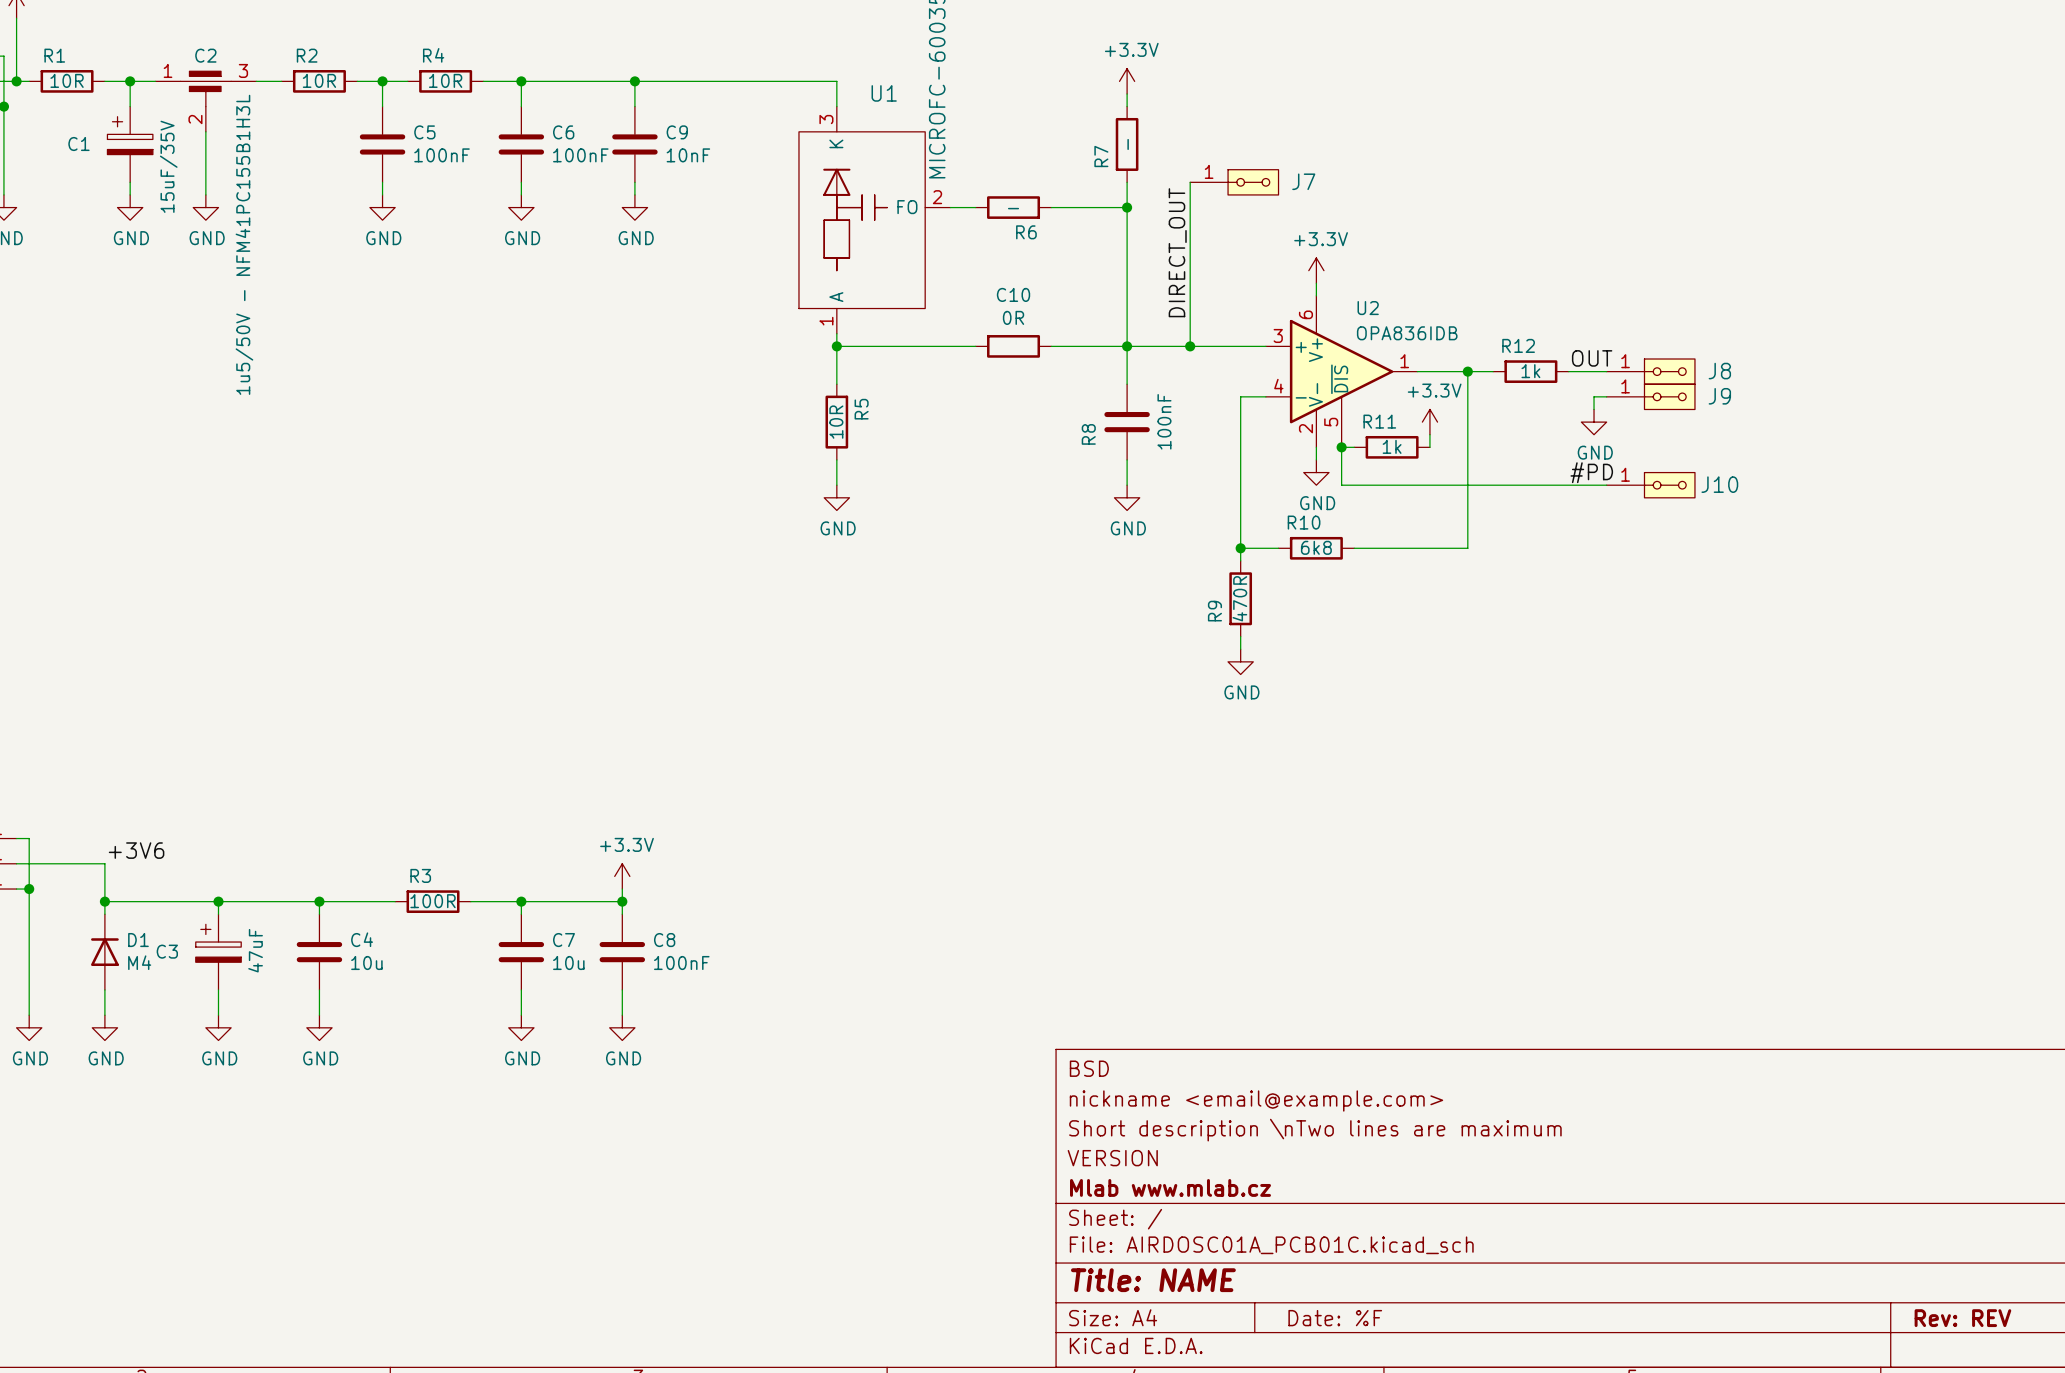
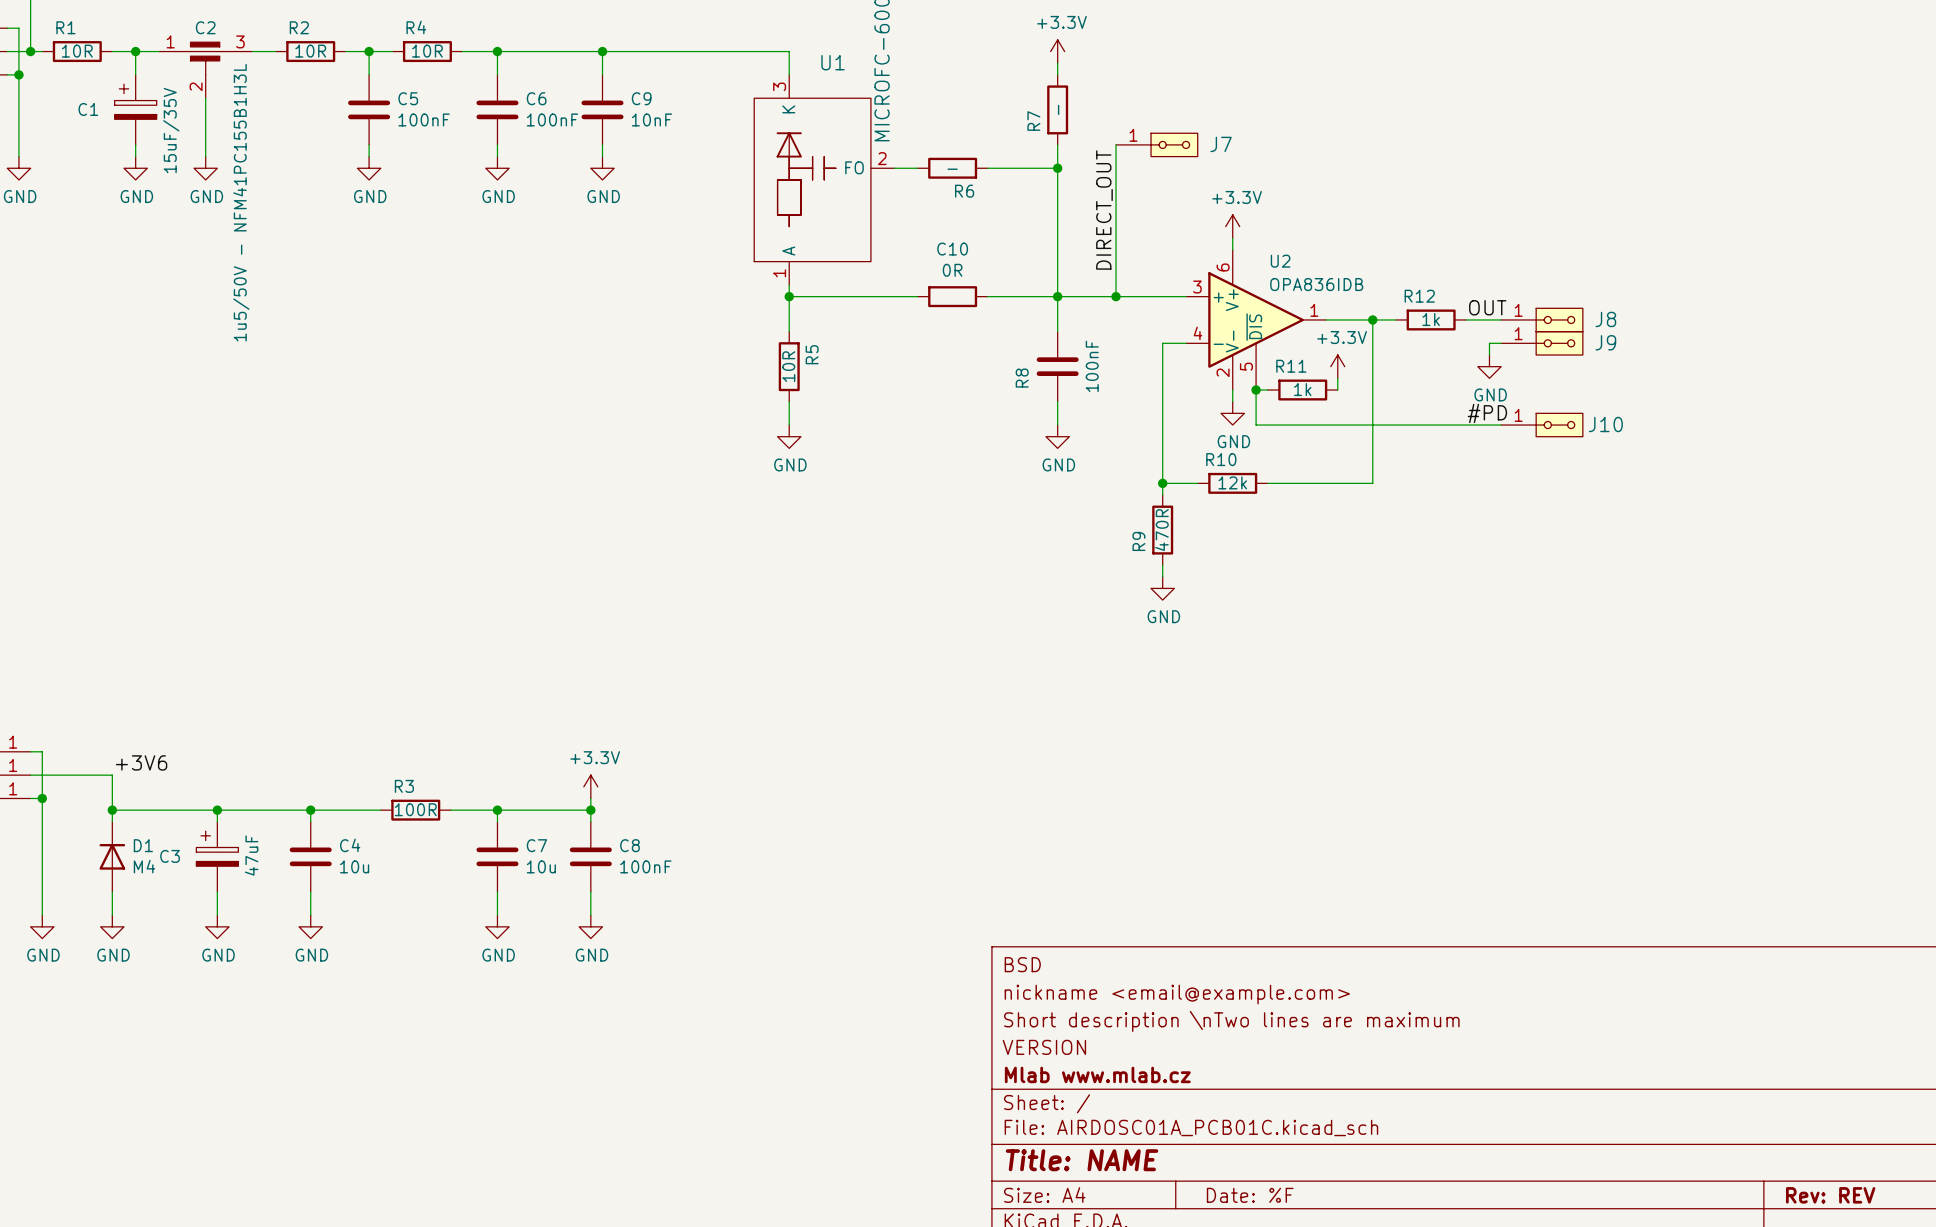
R10 value: 6k8 (1316, 547) -> 12k (1232, 482)

